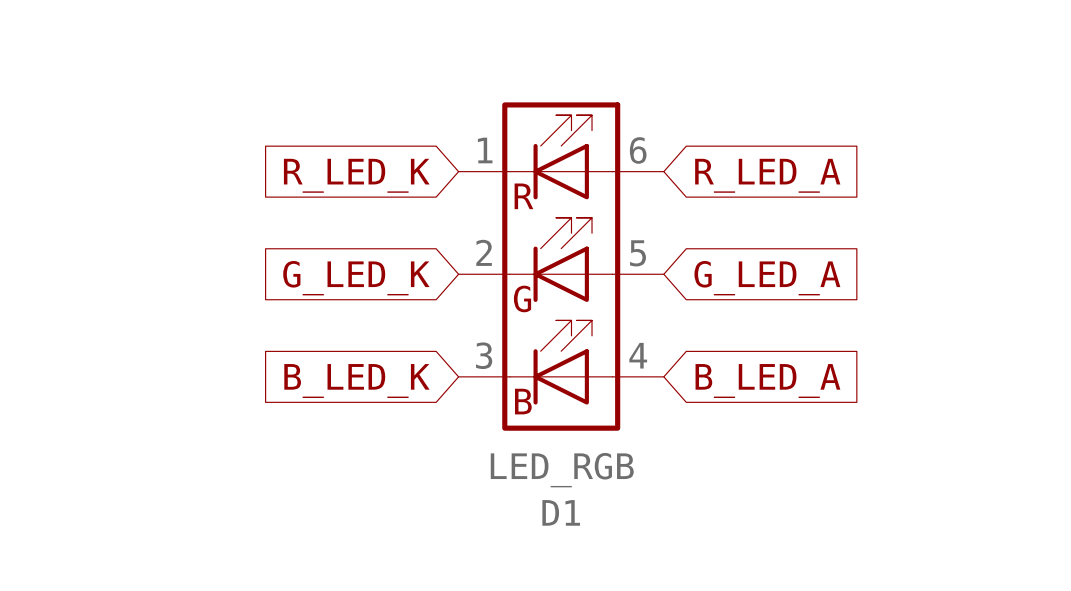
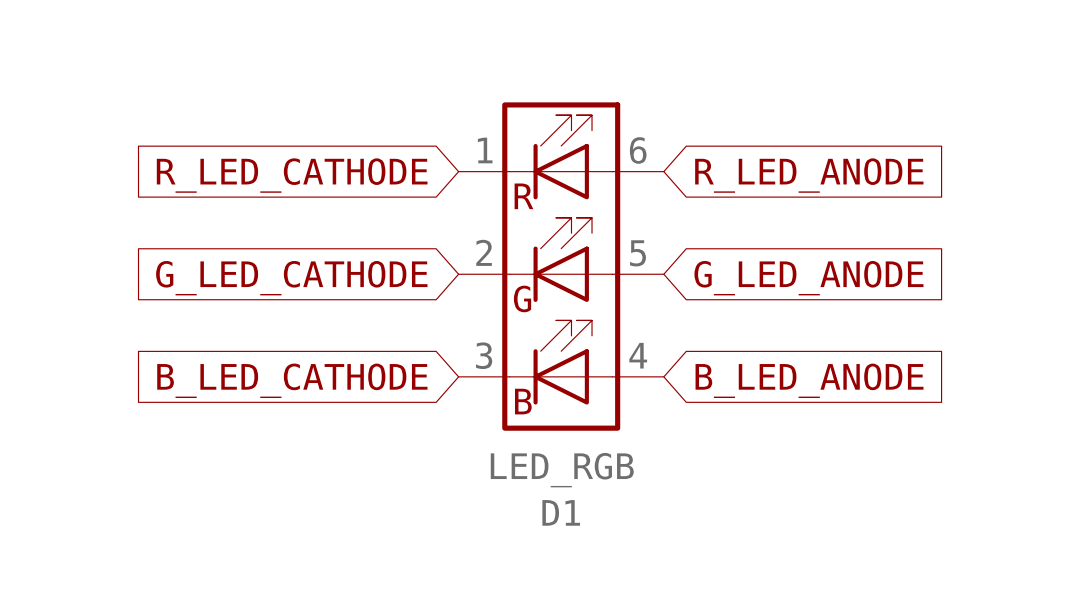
global label: R_LED_K (356, 175) -> R_LED_CATHODE (292, 175)
global label: R_LED_A (767, 175) -> R_LED_ANODE (809, 175)
global label: G_LED_K (356, 278) -> G_LED_CATHODE (291, 278)
global label: G_LED_A (767, 278) -> G_LED_ANODE (808, 278)
global label: B_LED_K (356, 381) -> B_LED_CATHODE (292, 380)
global label: B_LED_A (767, 381) -> B_LED_ANODE (809, 380)

